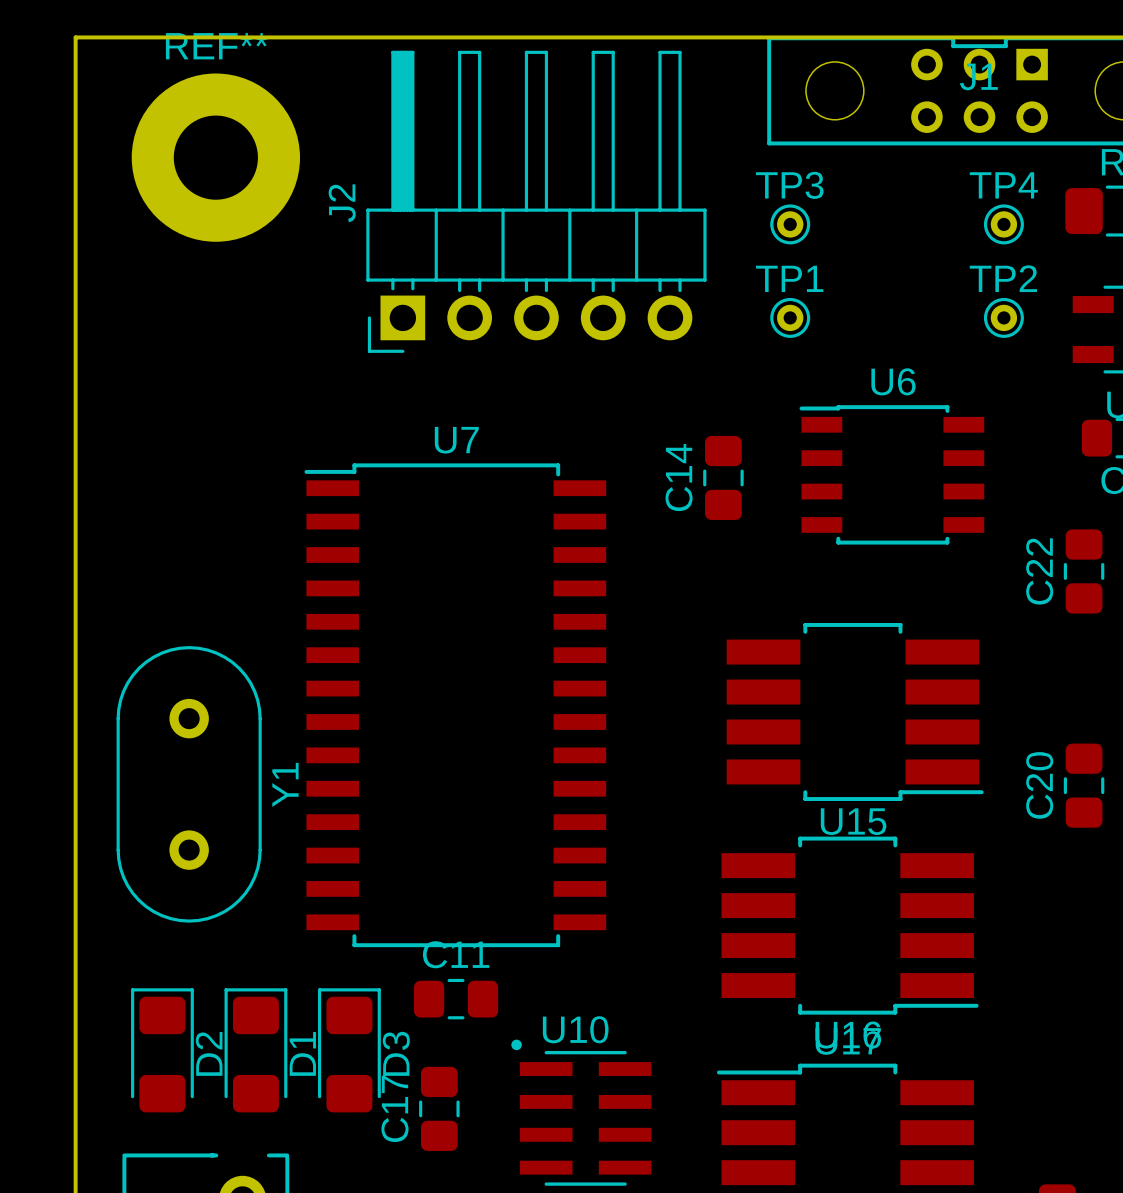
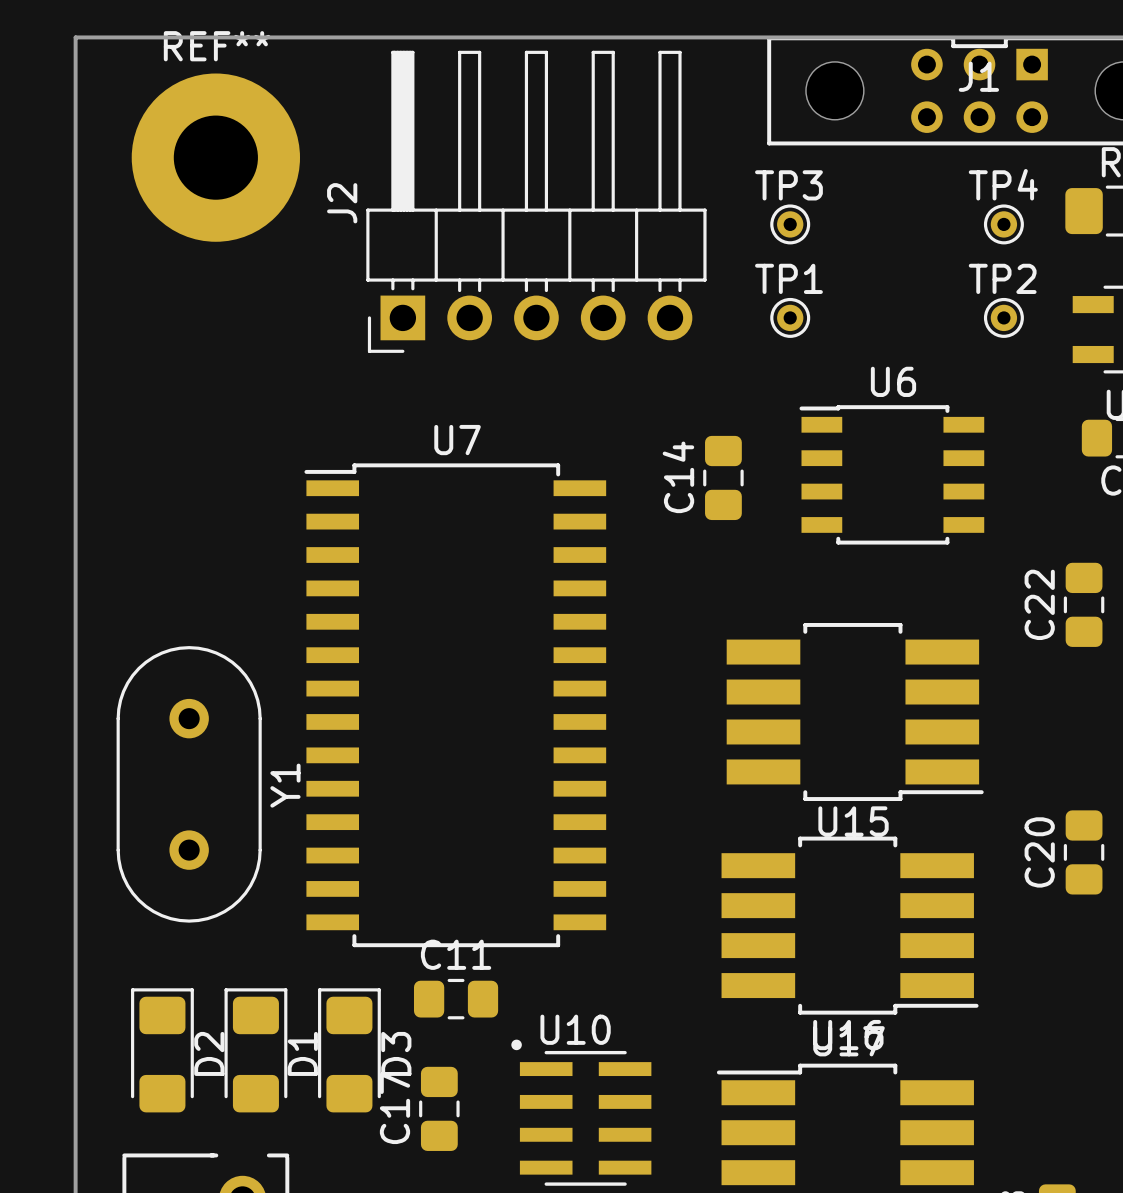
C22 position: (1084, 571) -> (1084, 604)
C20 position: (1084, 785) -> (1084, 852)

